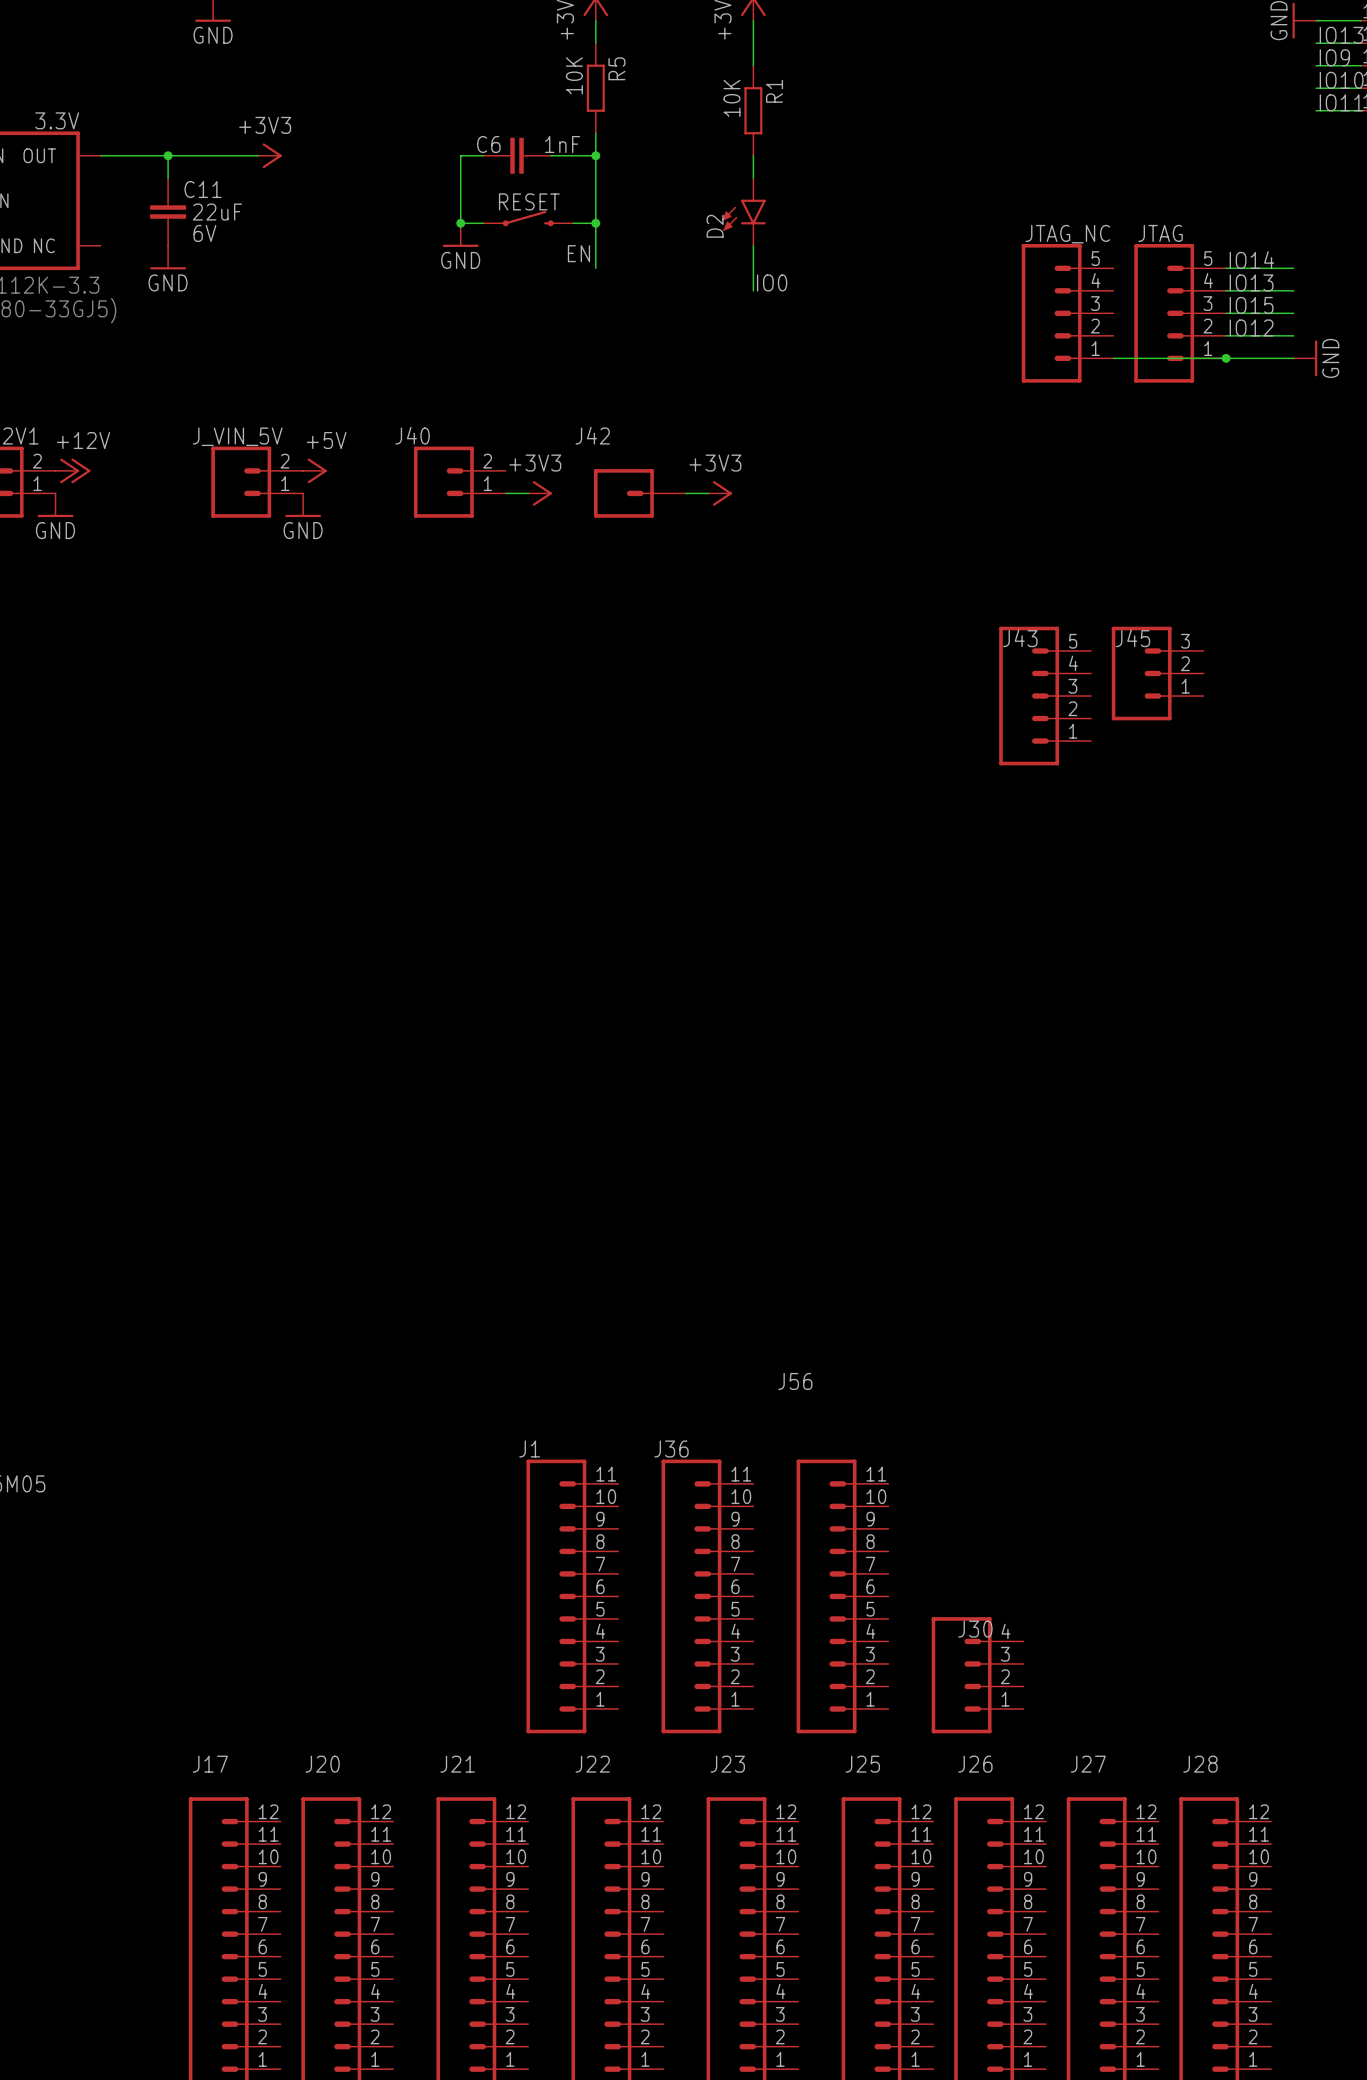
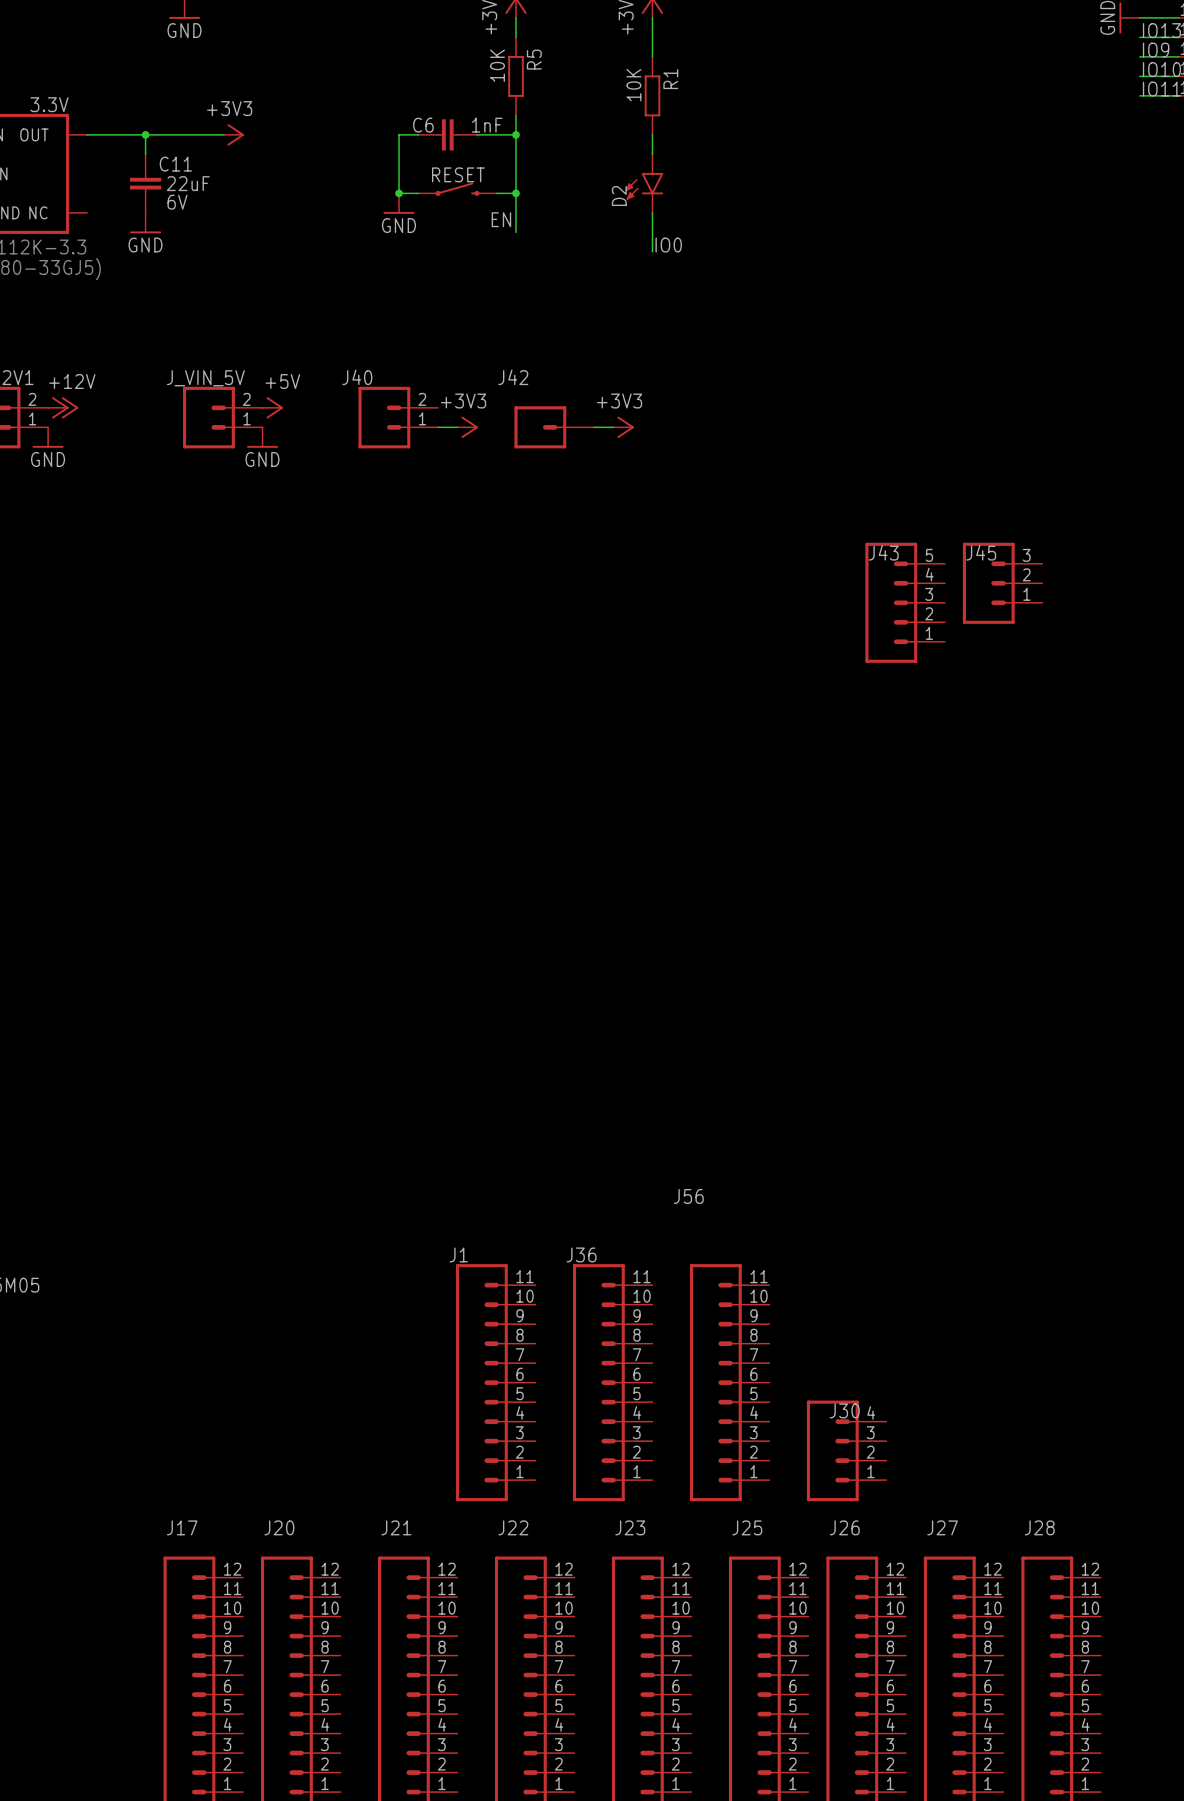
label: IO14 (1251, 260) -> none
wire: (1226, 268) (1293, 268) -> none
label: IO13 (1251, 282) -> none
wire: (1226, 290) (1293, 290) -> none
label: IO15 (1251, 305) -> none
JTAG_NC: (1067, 313) -> none
JTAG: (1180, 313) -> none
wire: (1226, 313) (1293, 313) -> none
label: IO12 (1251, 327) -> none
wire: (1226, 335) (1293, 335) -> none
wire: (1113, 358) (1293, 358) -> none
junction: (1226, 358) -> none
power symbol: GND (1305, 358) -> none

